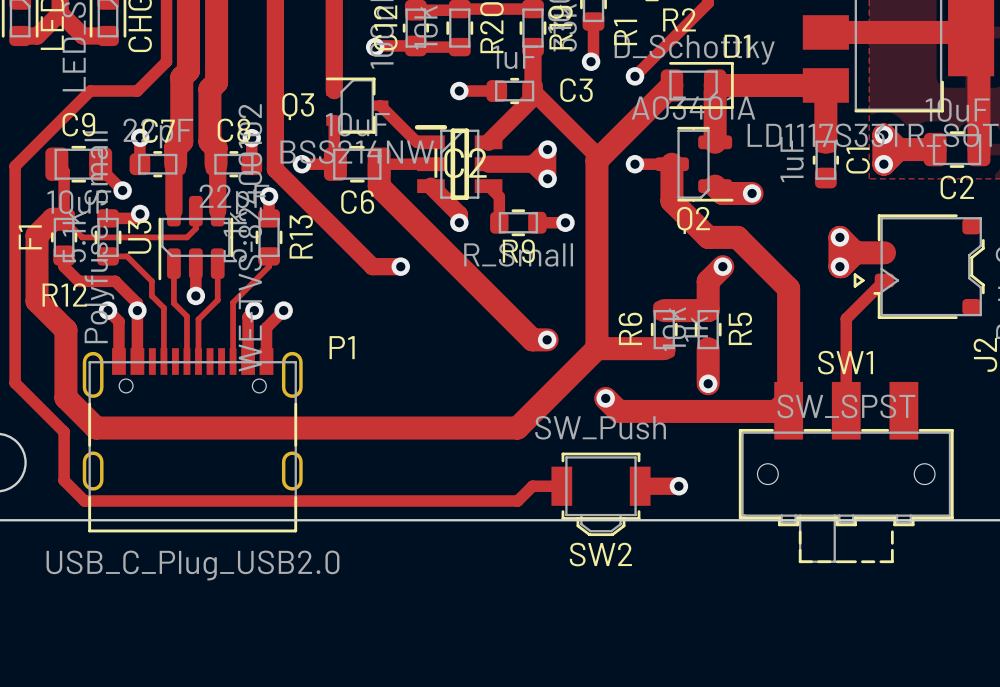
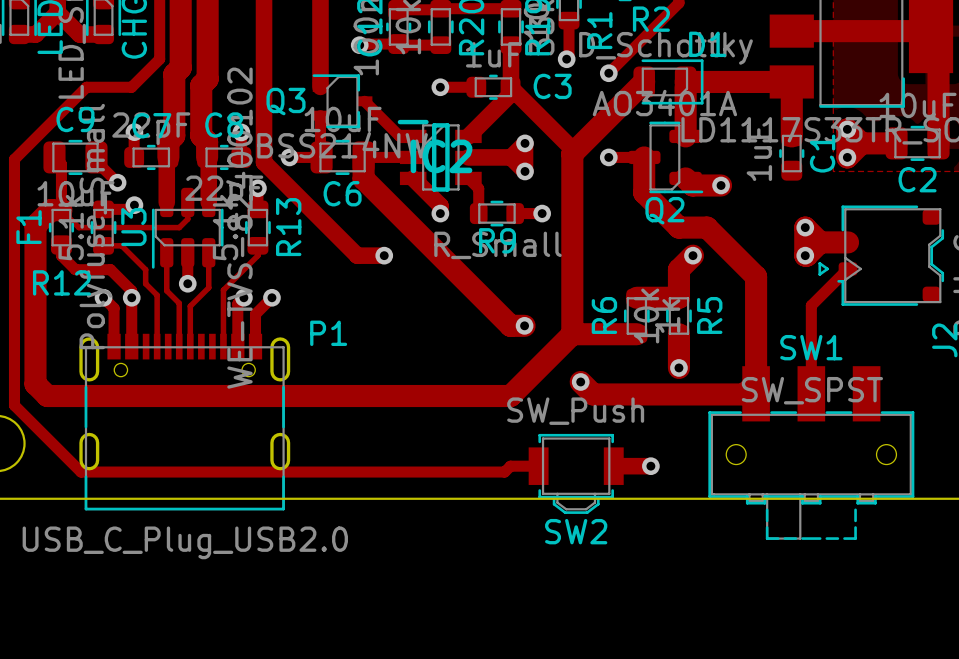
track: (37, 301) (65, 330) (65, 397) (96, 428) (517, 428) (532, 413) -> (35, 288) (35, 384) (47, 396) (510, 396)
track: (15, 382) (64, 431) (64, 480) (84, 501) (517, 501) (526, 492) -> (14, 367) (14, 405) (81, 472) (504, 472)

